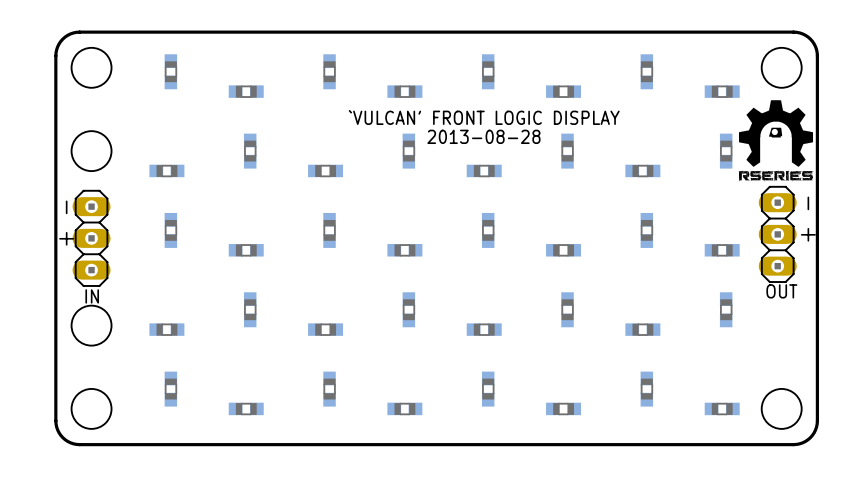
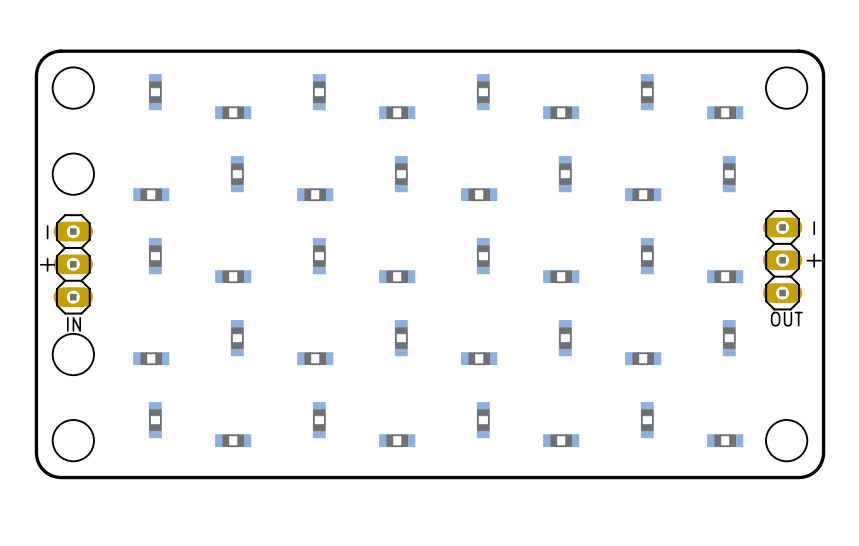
drawing: [738, 100, 814, 182] -> none
text: `VULCAN' FRONT LOGIC DISPLAY (484, 117) -> none
text: 2013-08-28 (483, 136) -> none

